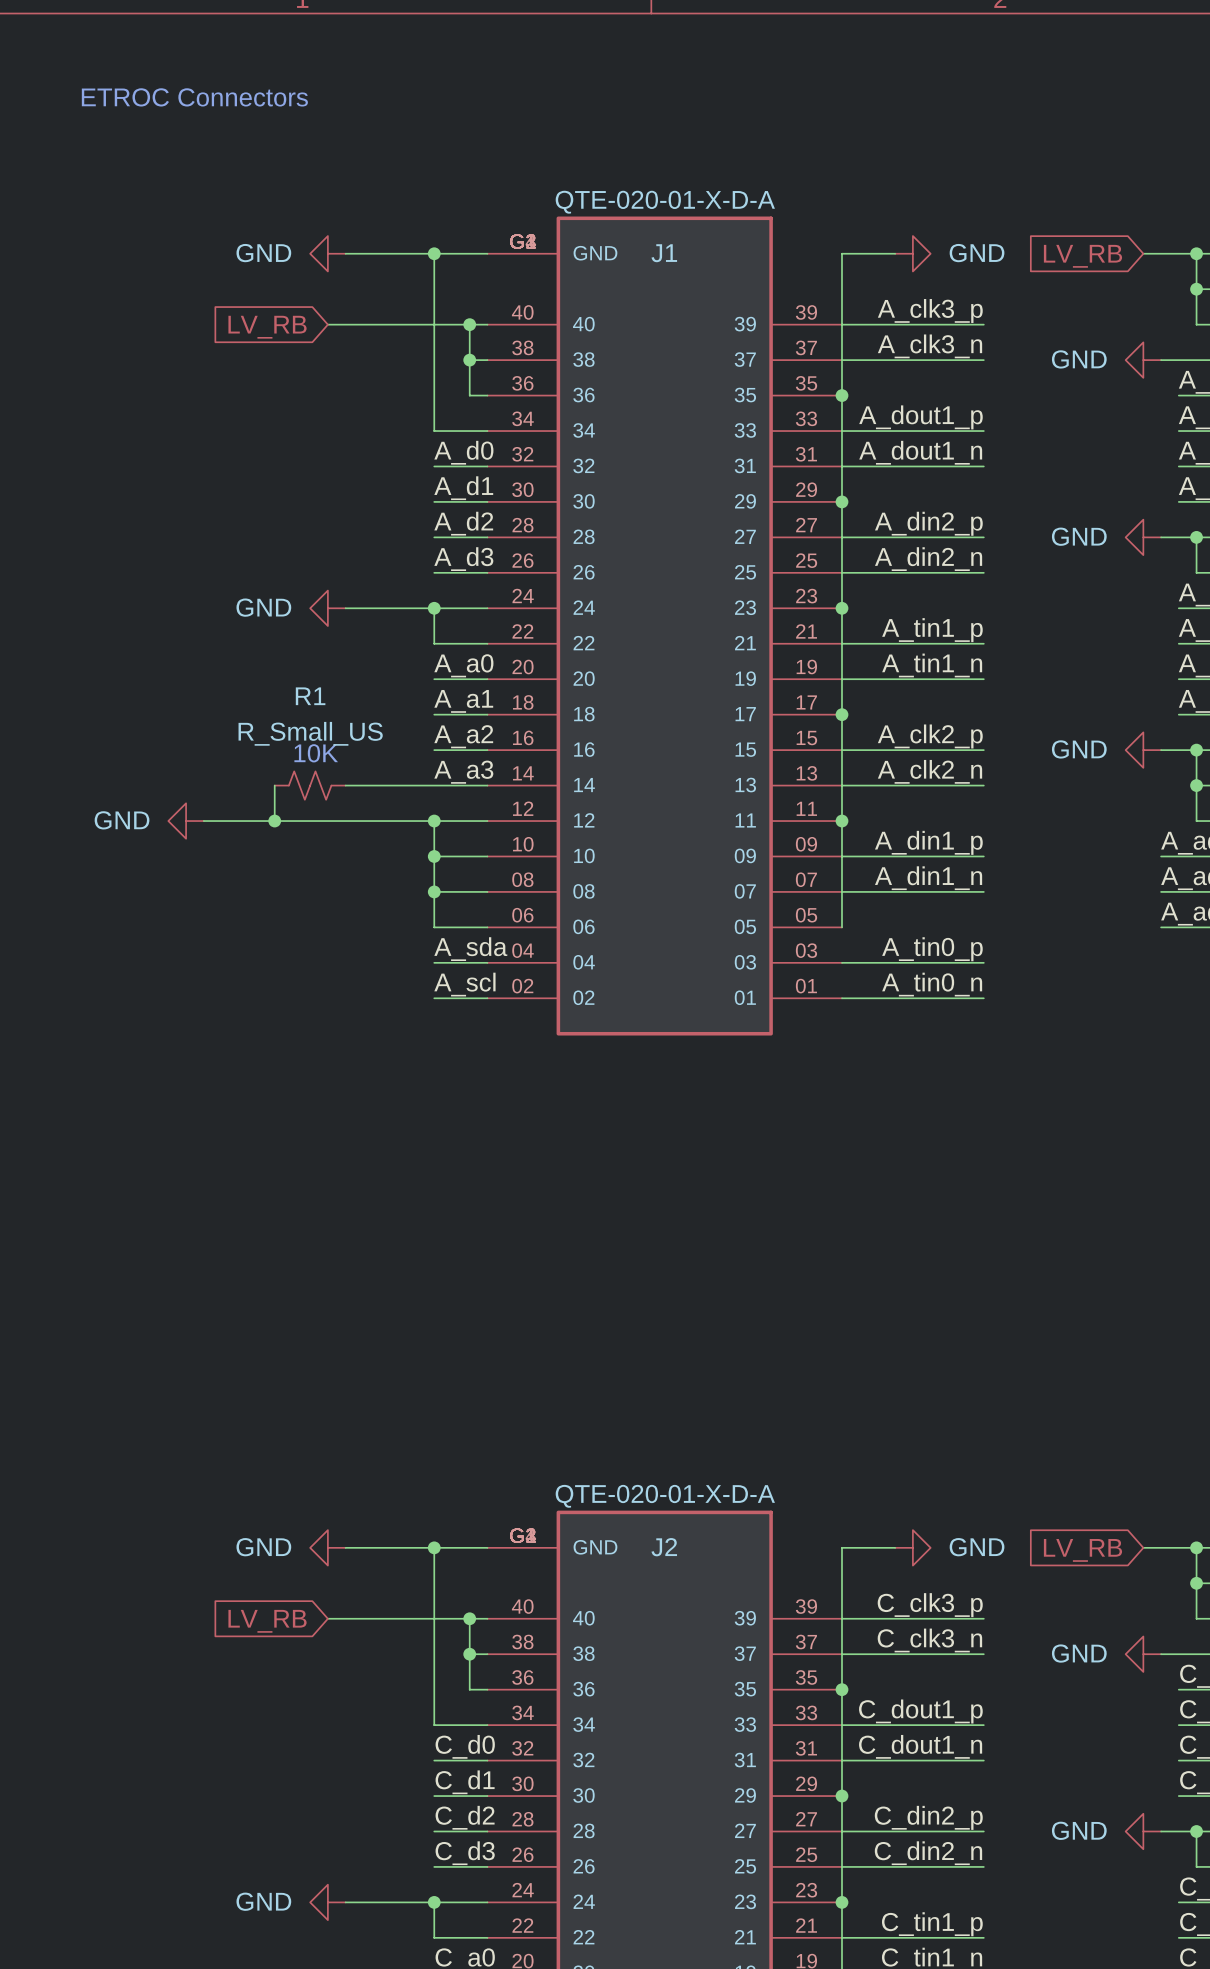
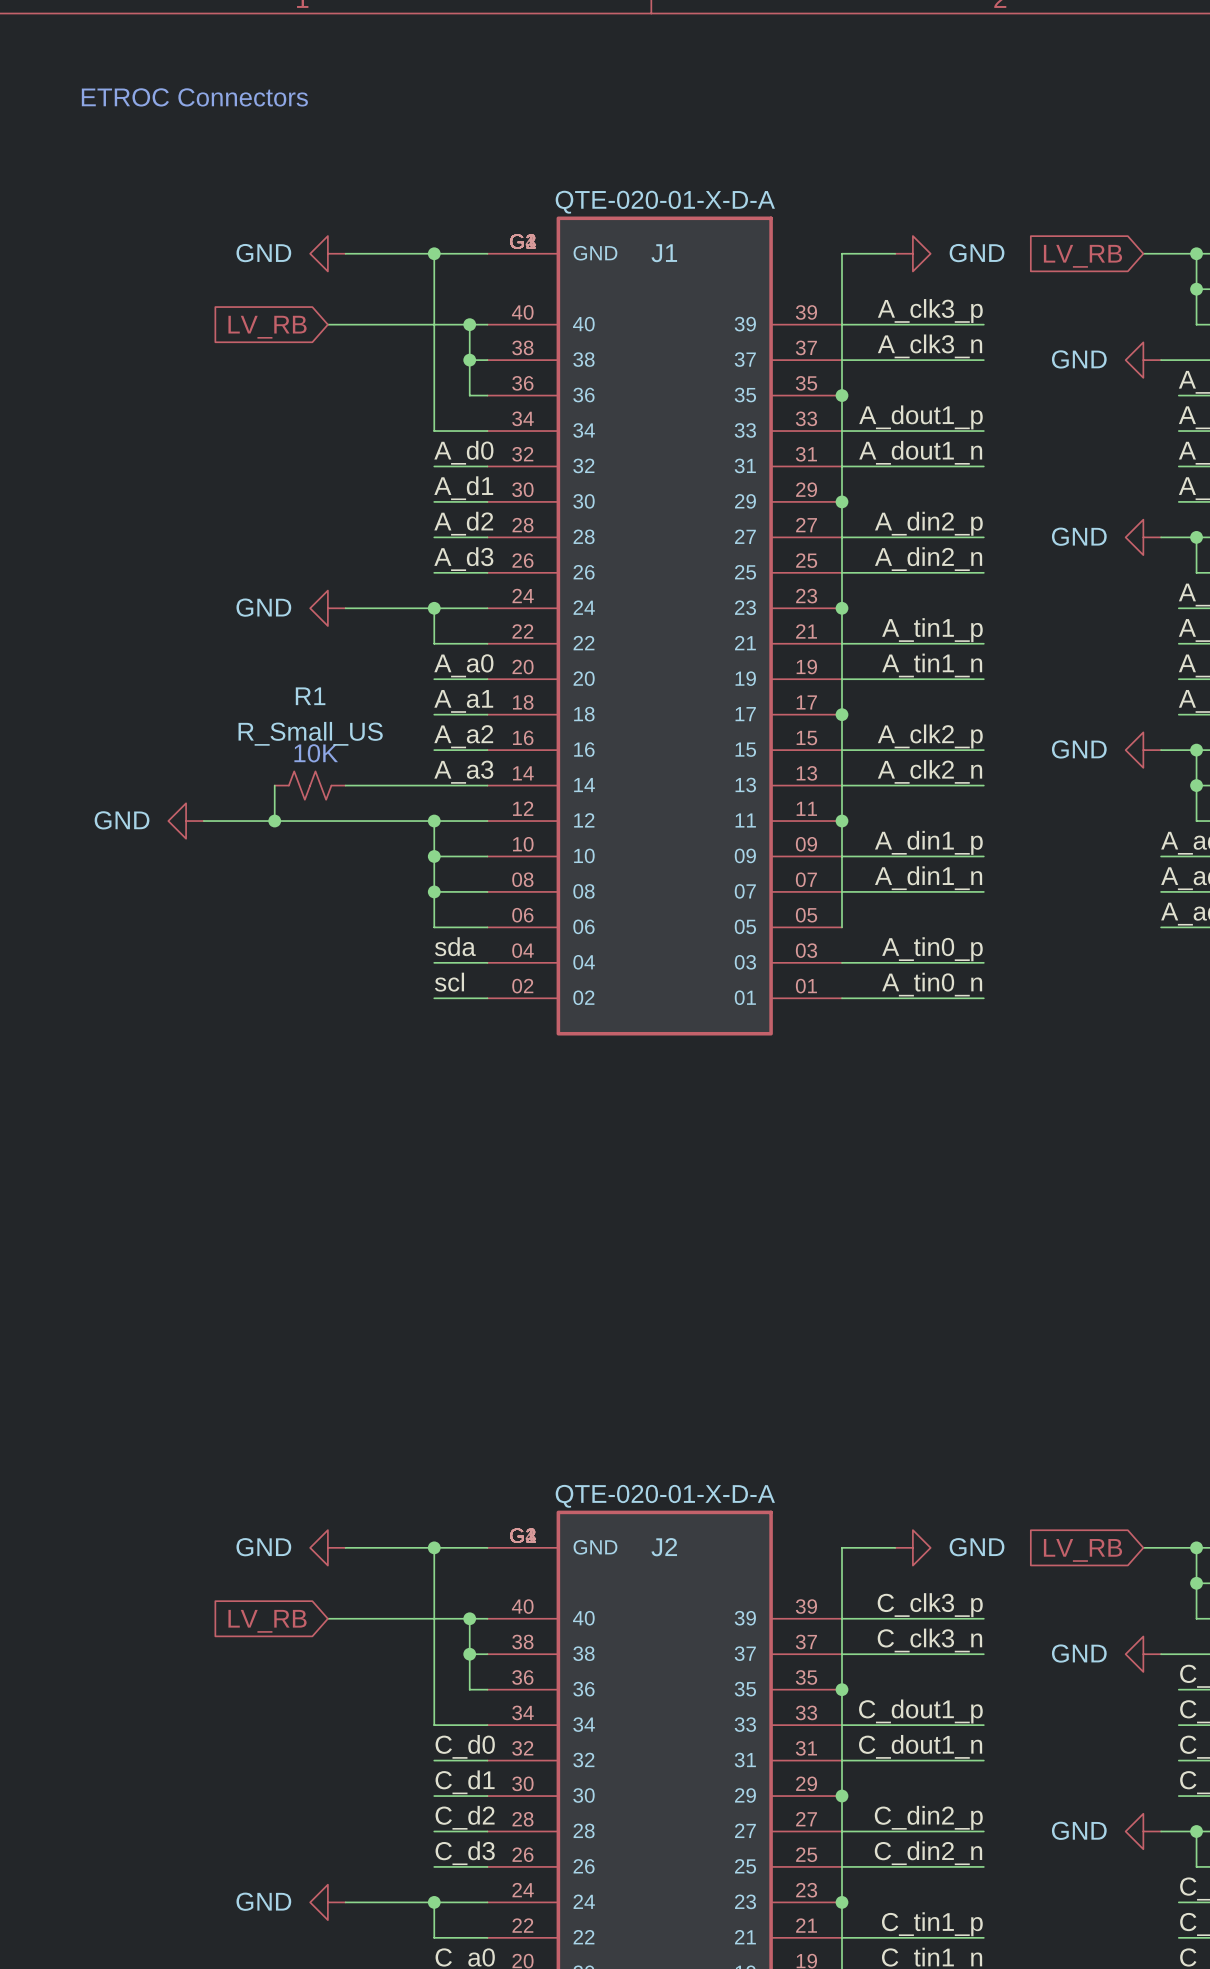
label: A_sda (470, 949) -> sda (455, 946)
label: A_scl (464, 984) -> scl (449, 982)

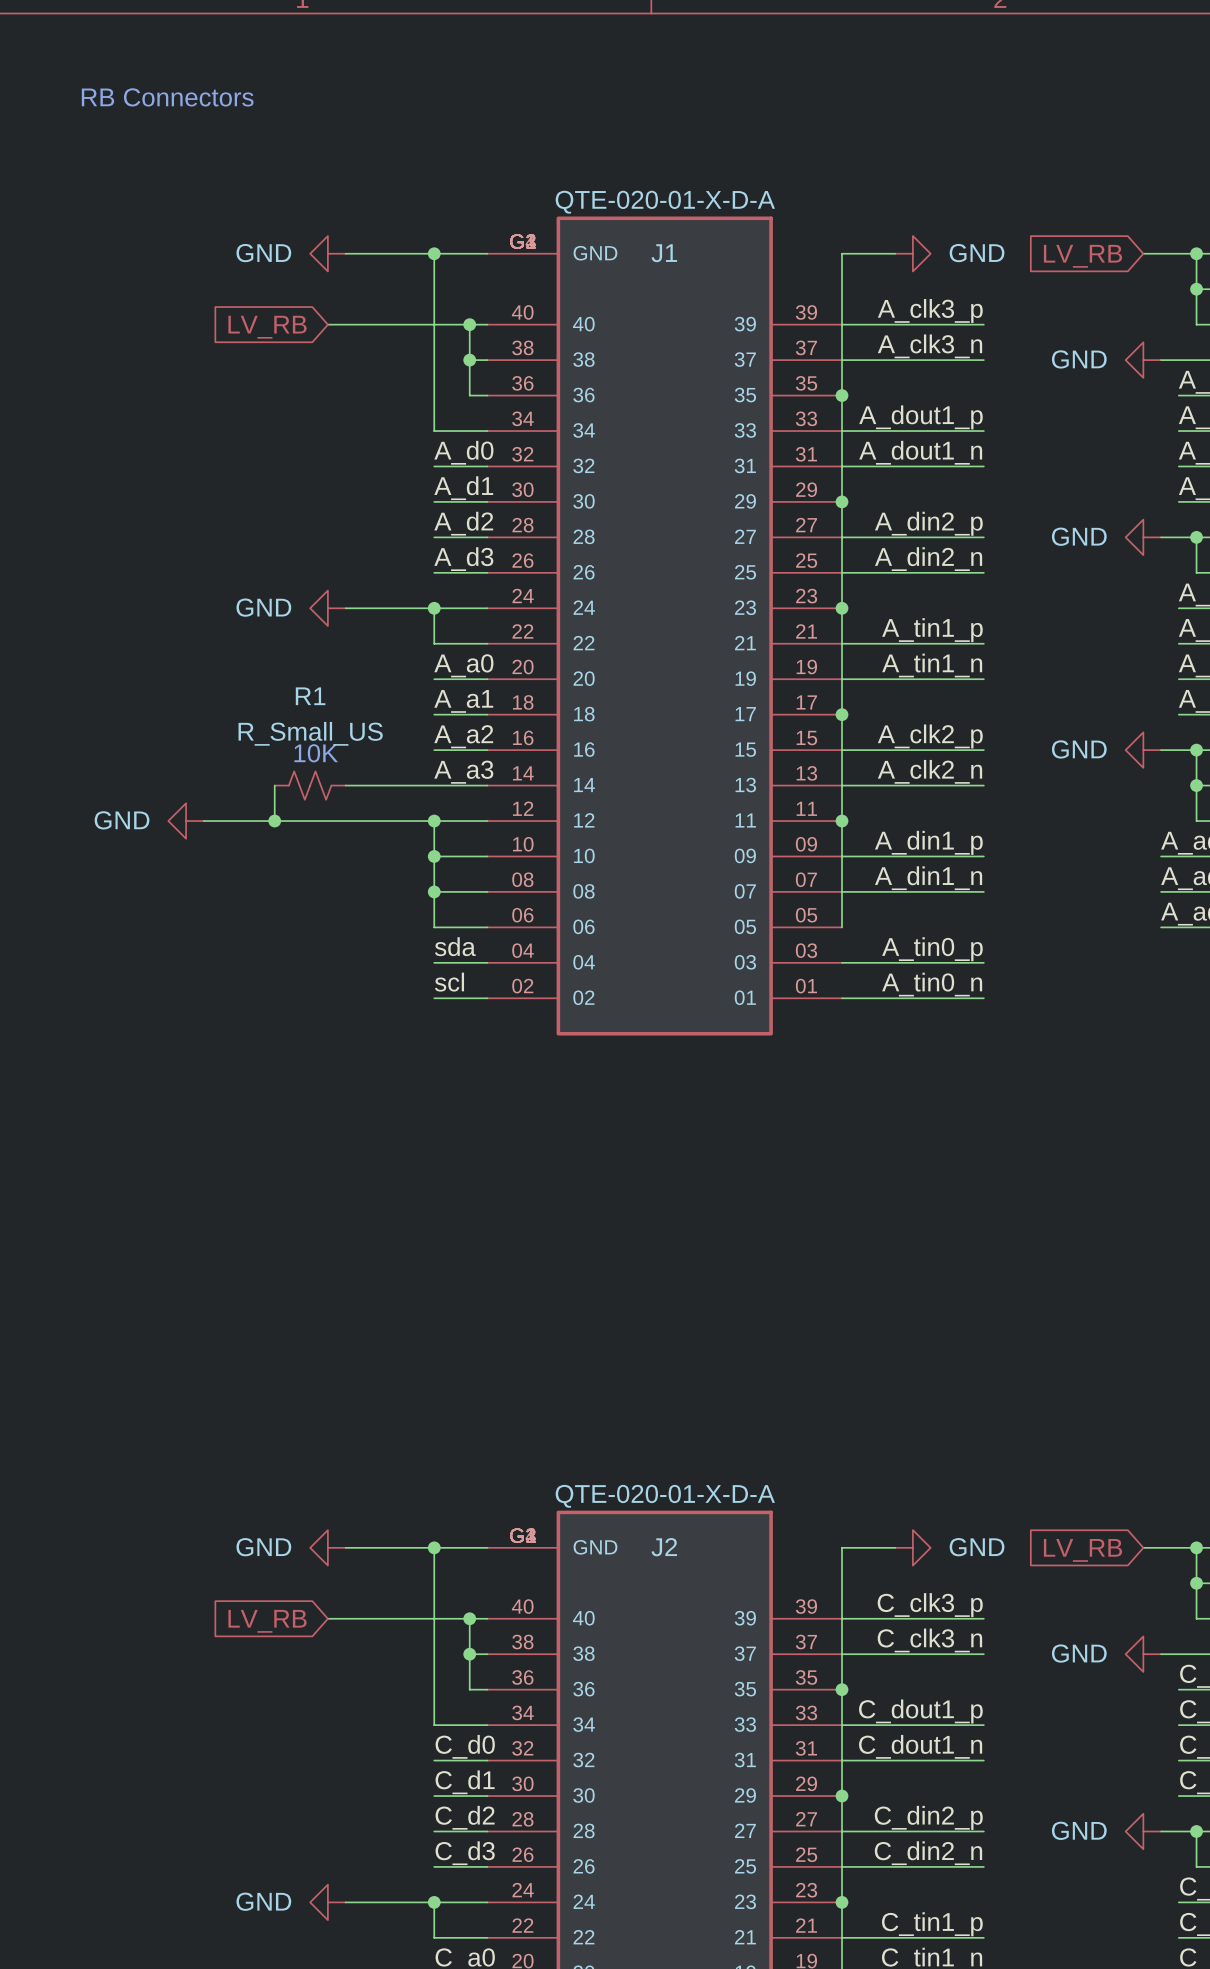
text: ETROC Connectors (194, 97) -> RB Connectors (167, 97)

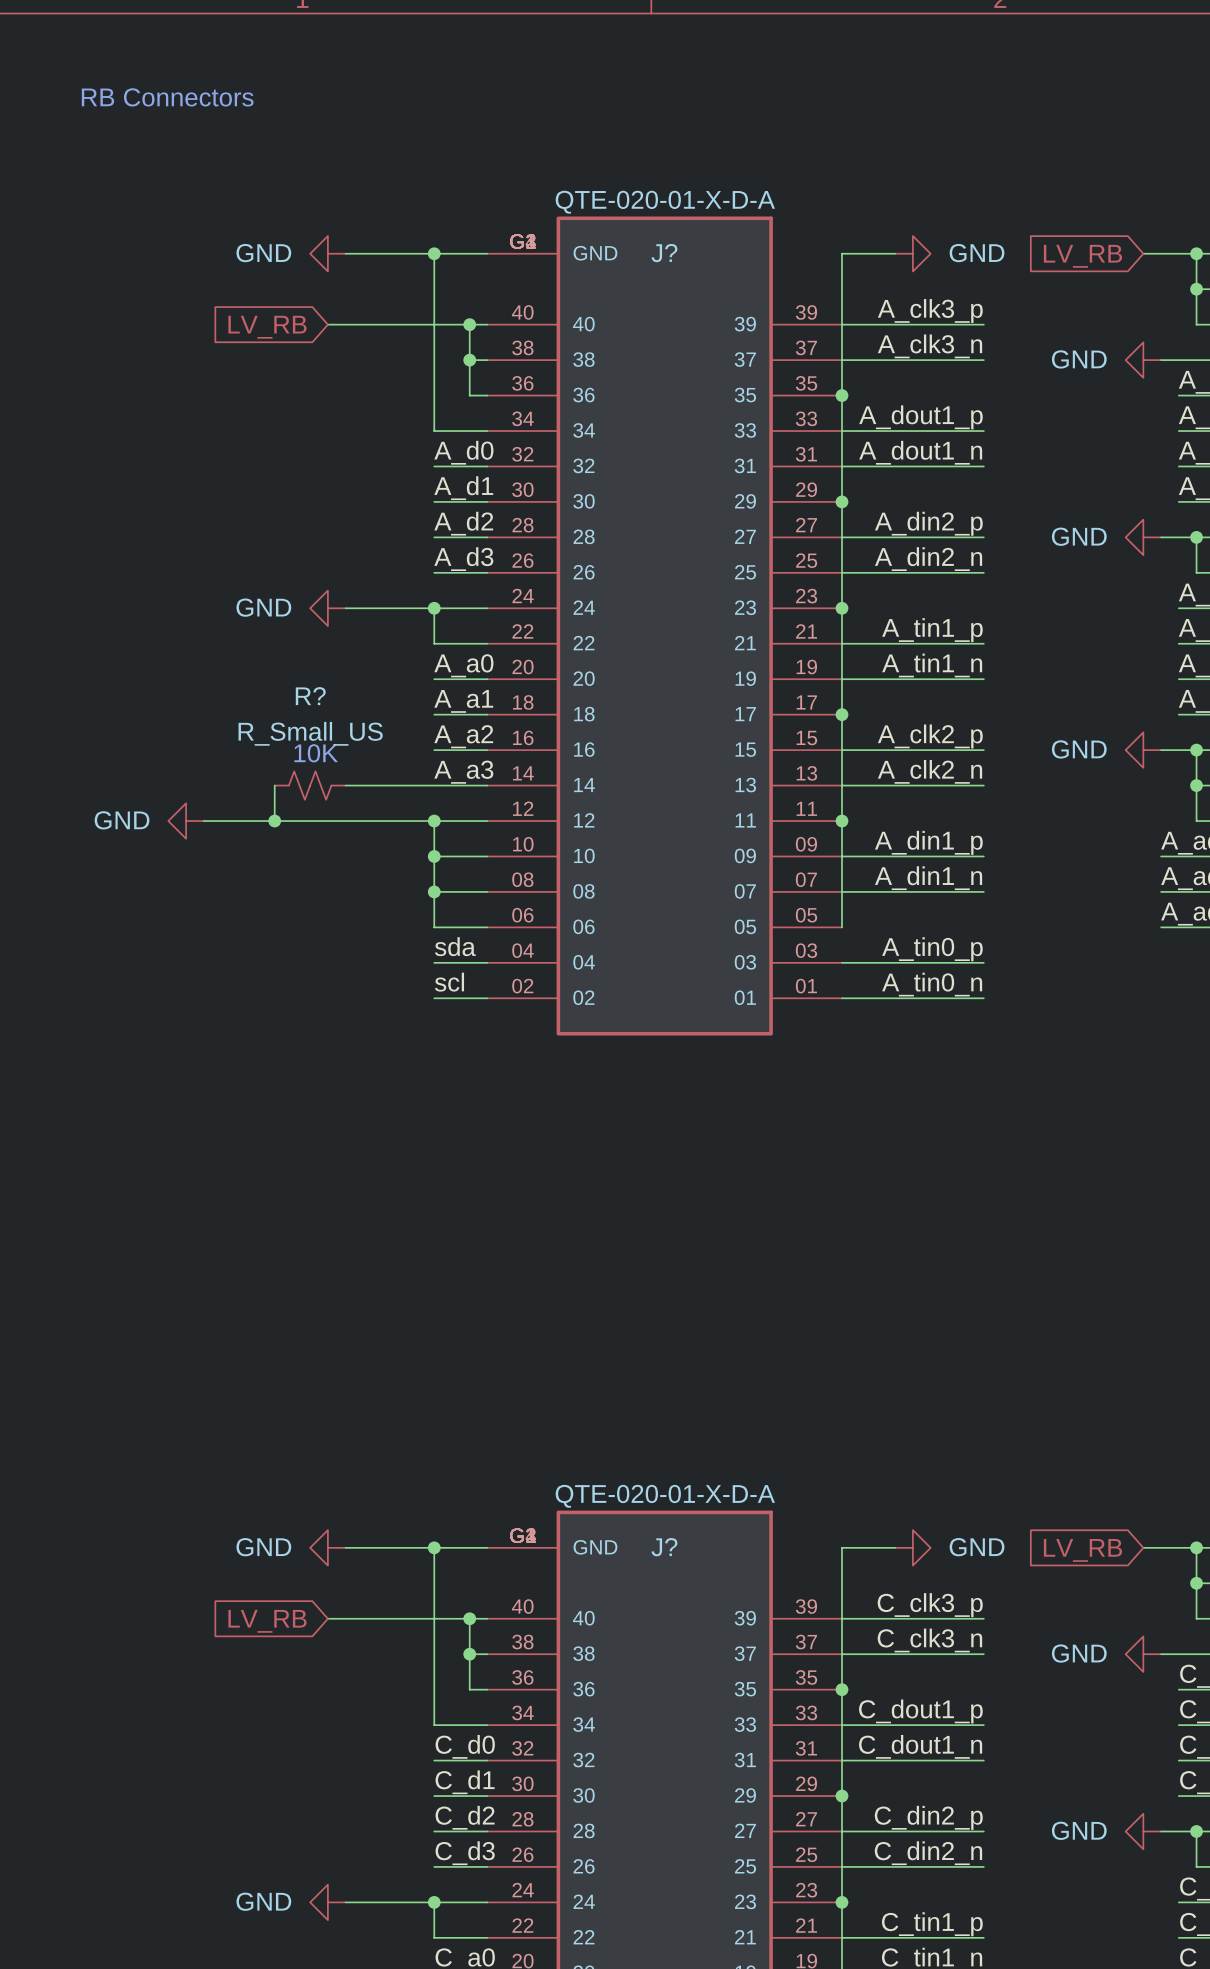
J1 name: J1 (664, 253) -> J? (664, 253)
R1 name: R1 (310, 696) -> R? (310, 696)
J2 name: J2 (664, 1547) -> J? (664, 1547)

